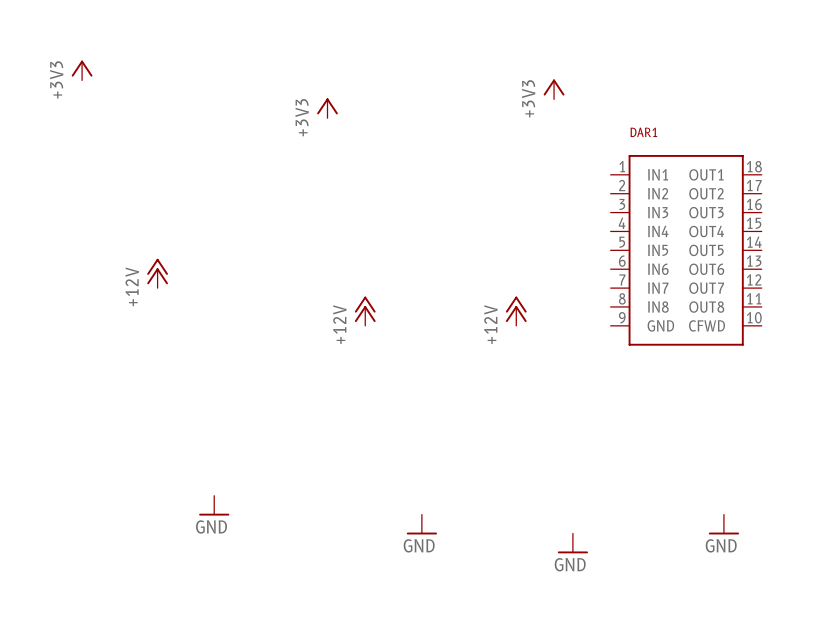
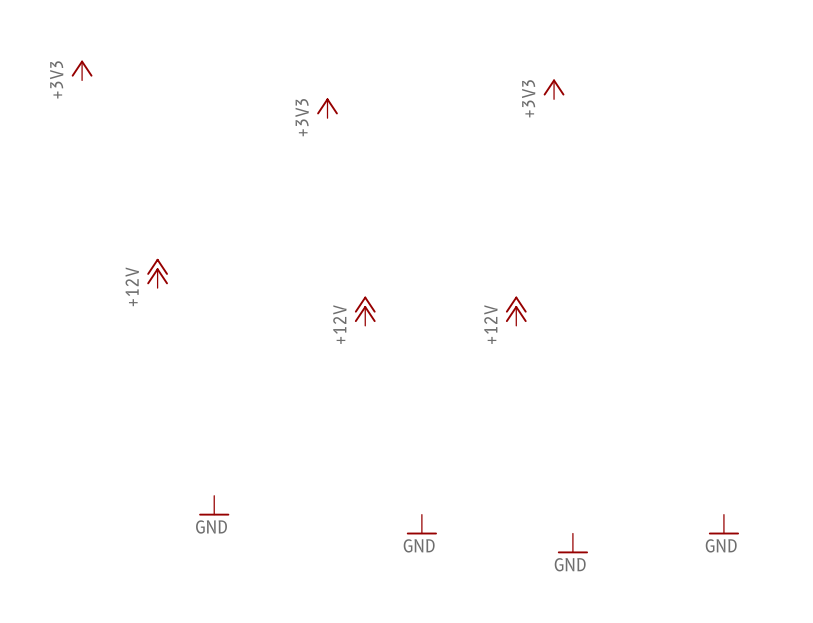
DAR1: (686, 250) -> none

